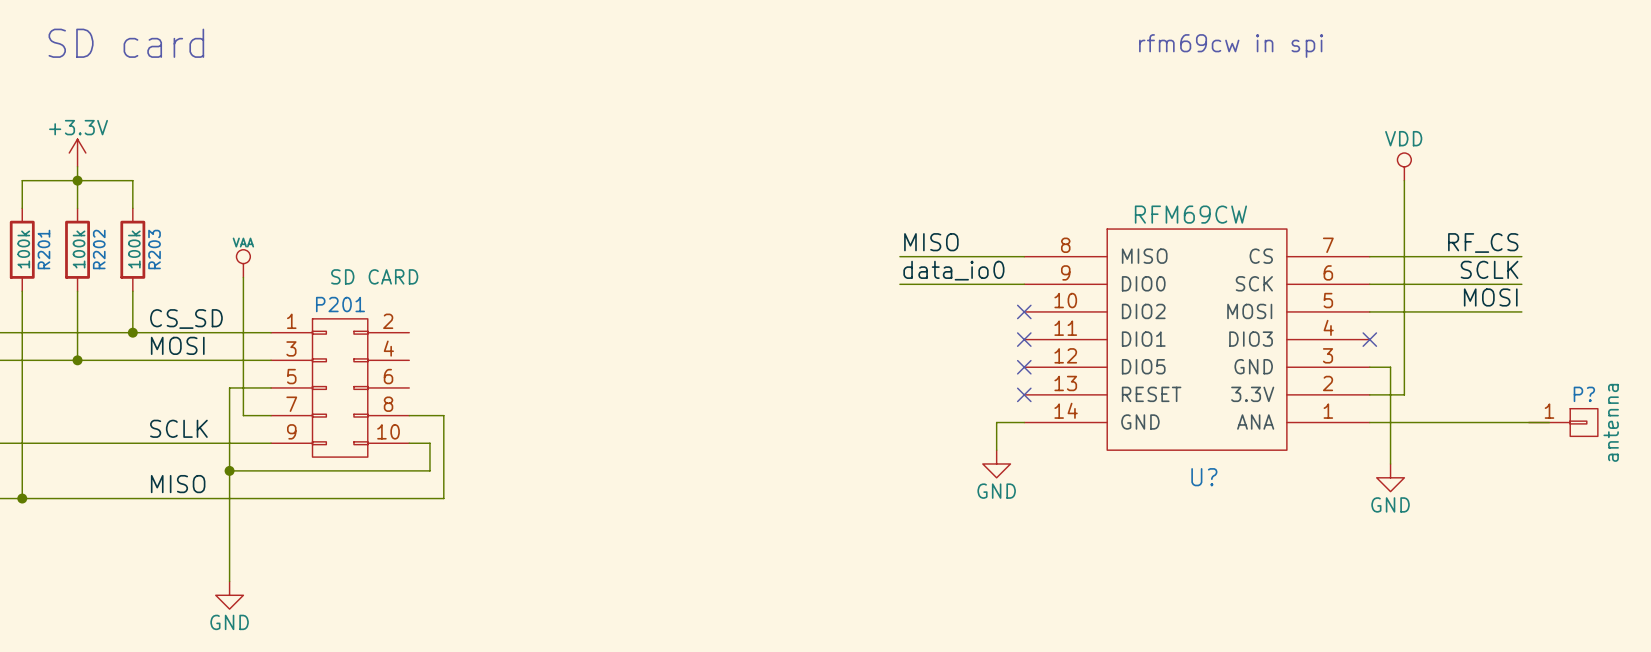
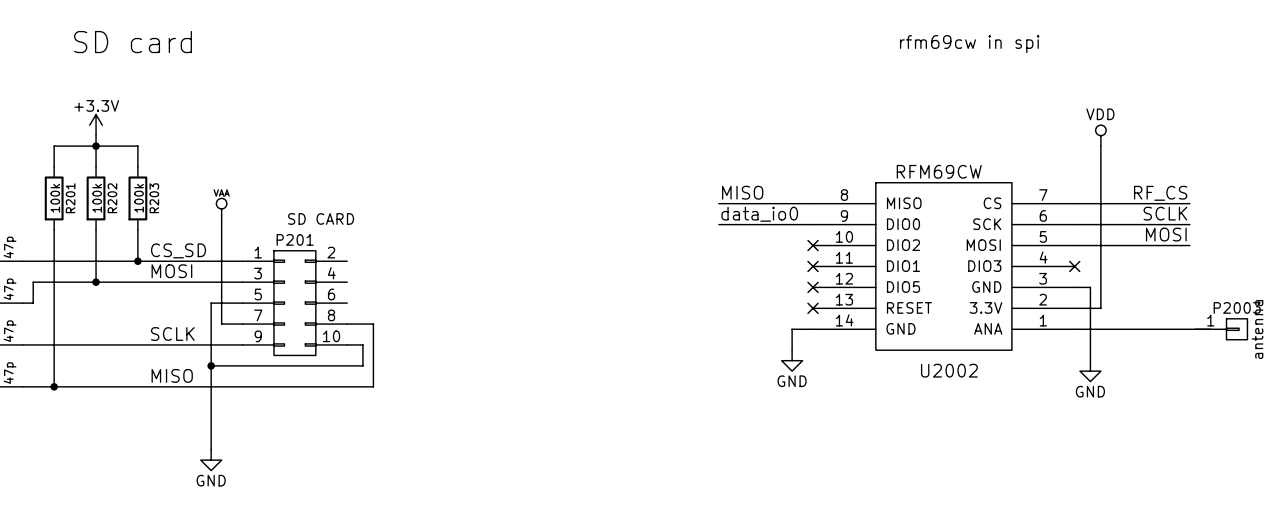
P? name: P? (1584, 394) -> P2003 (1237, 307)
U? name: U? (1204, 477) -> U2002 (949, 370)

